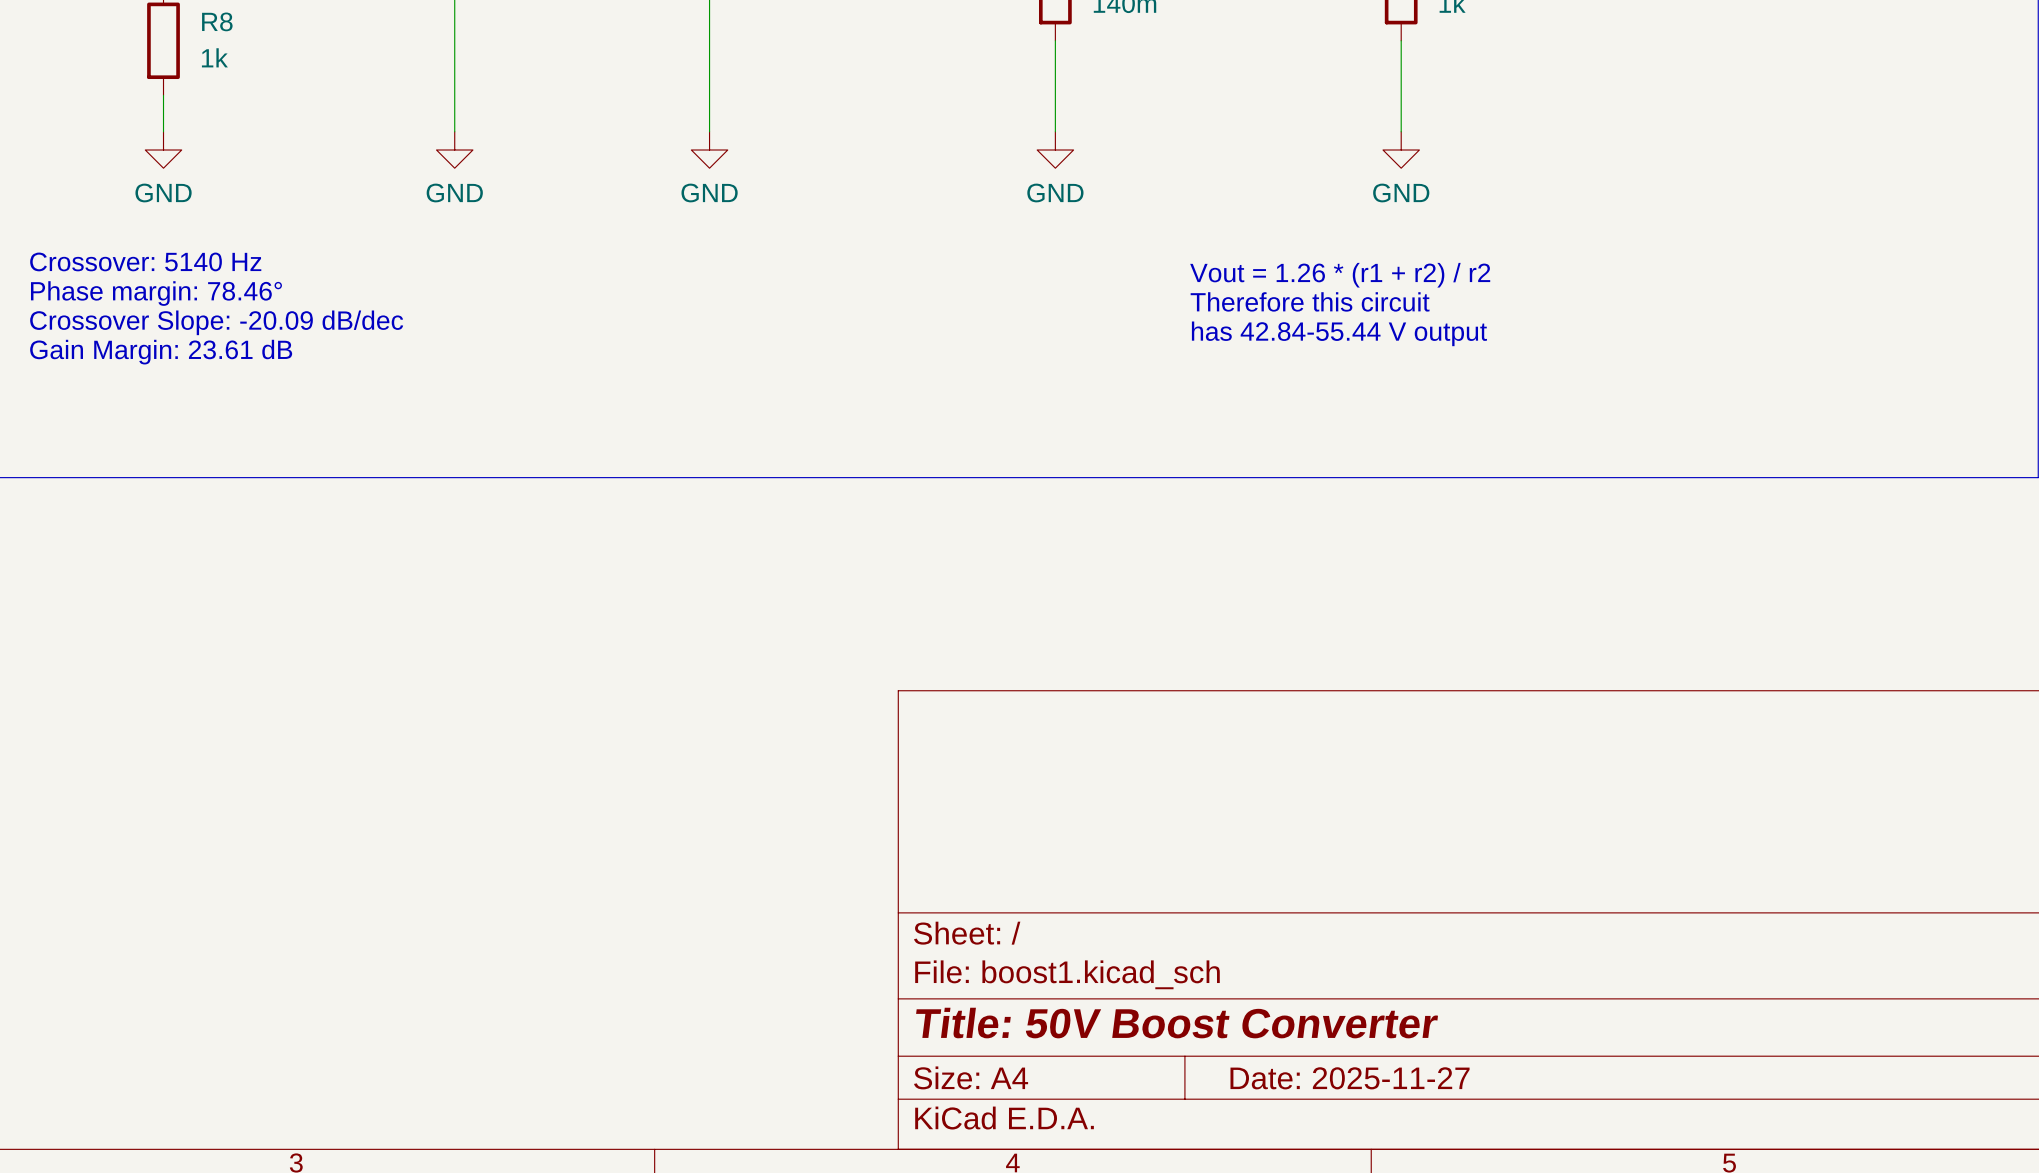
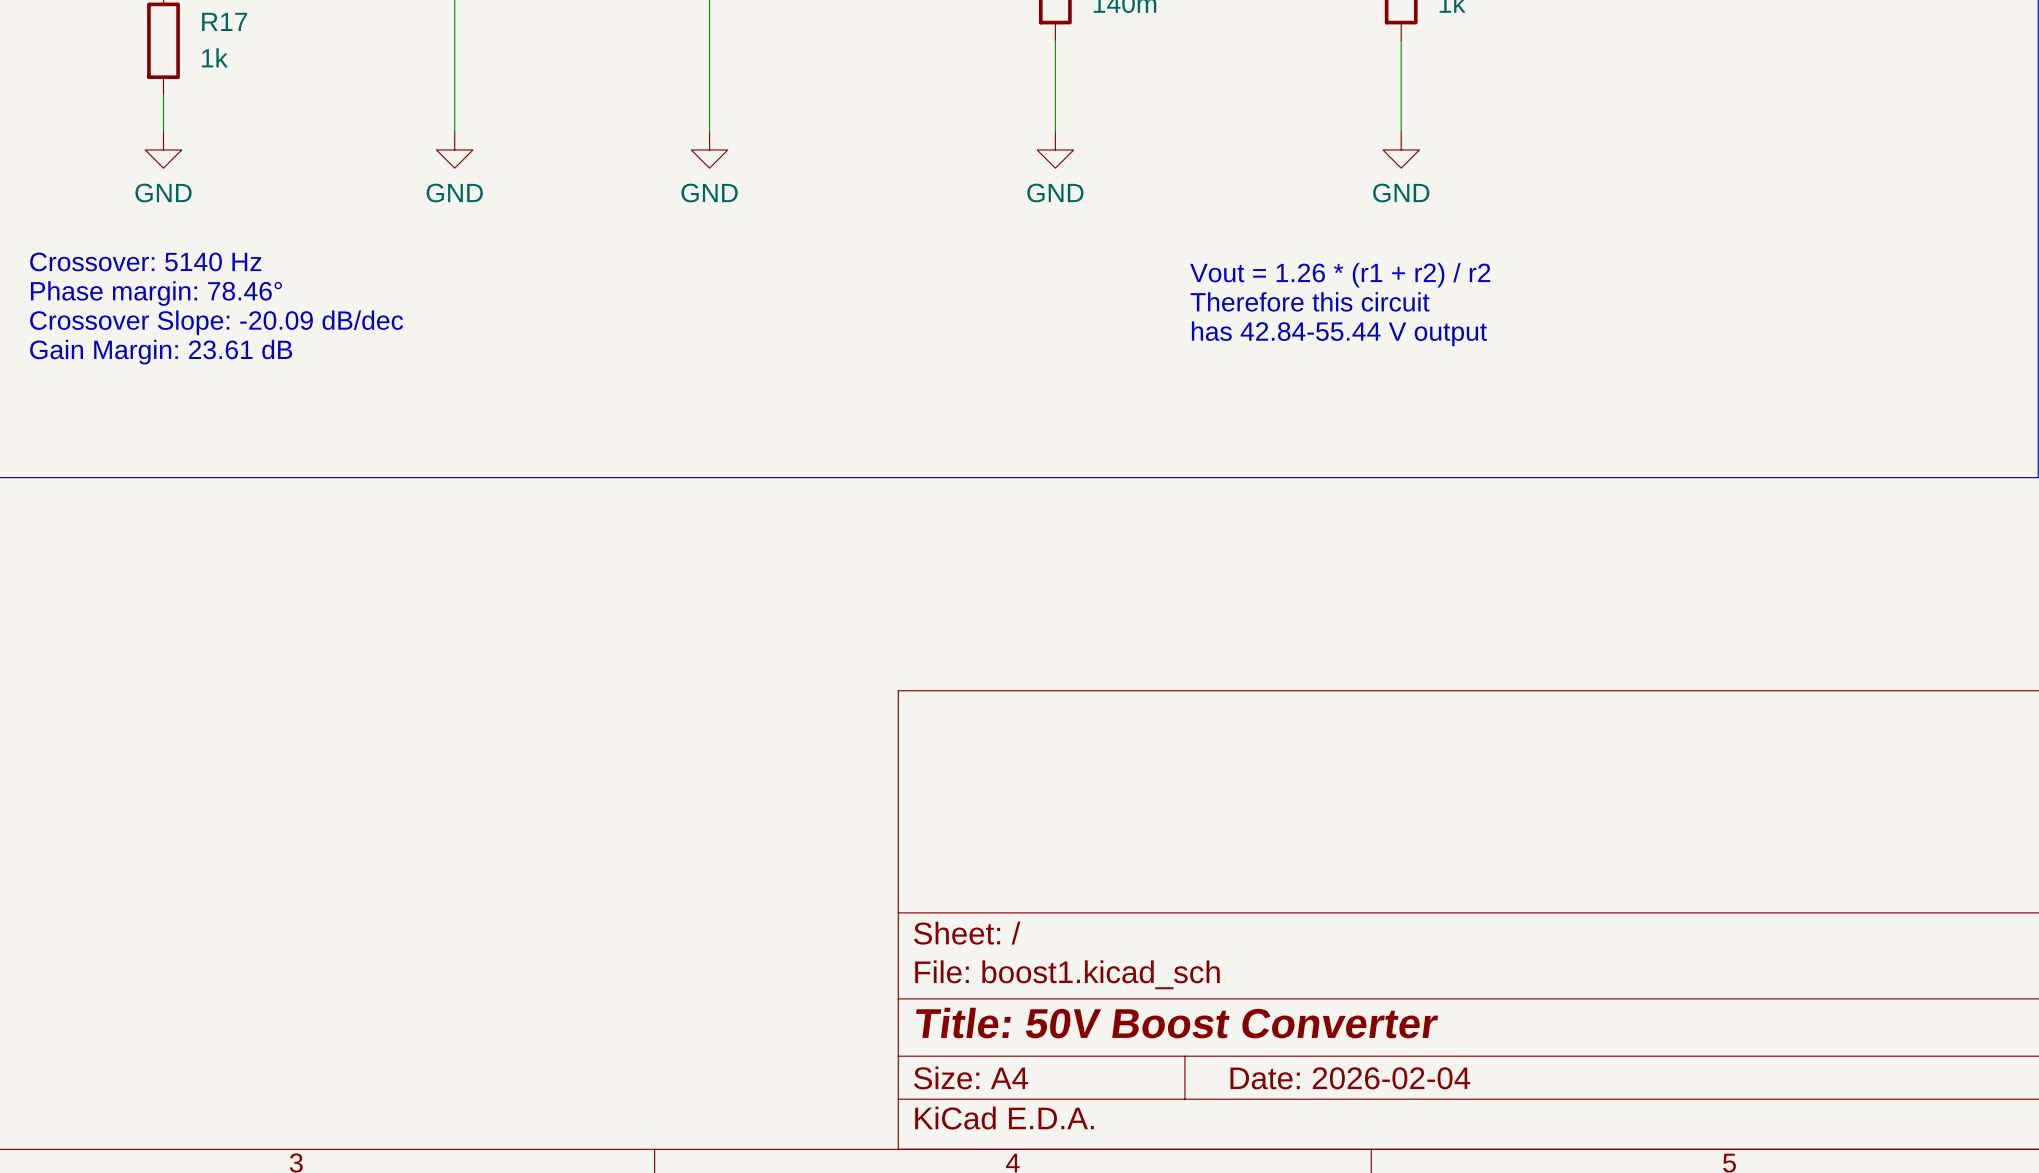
R8 name: R8 (217, 21) -> R17 (224, 21)
title block: Date: 2025-11-27 (1350, 1078) -> Date: 2026-02-04 (1350, 1078)

